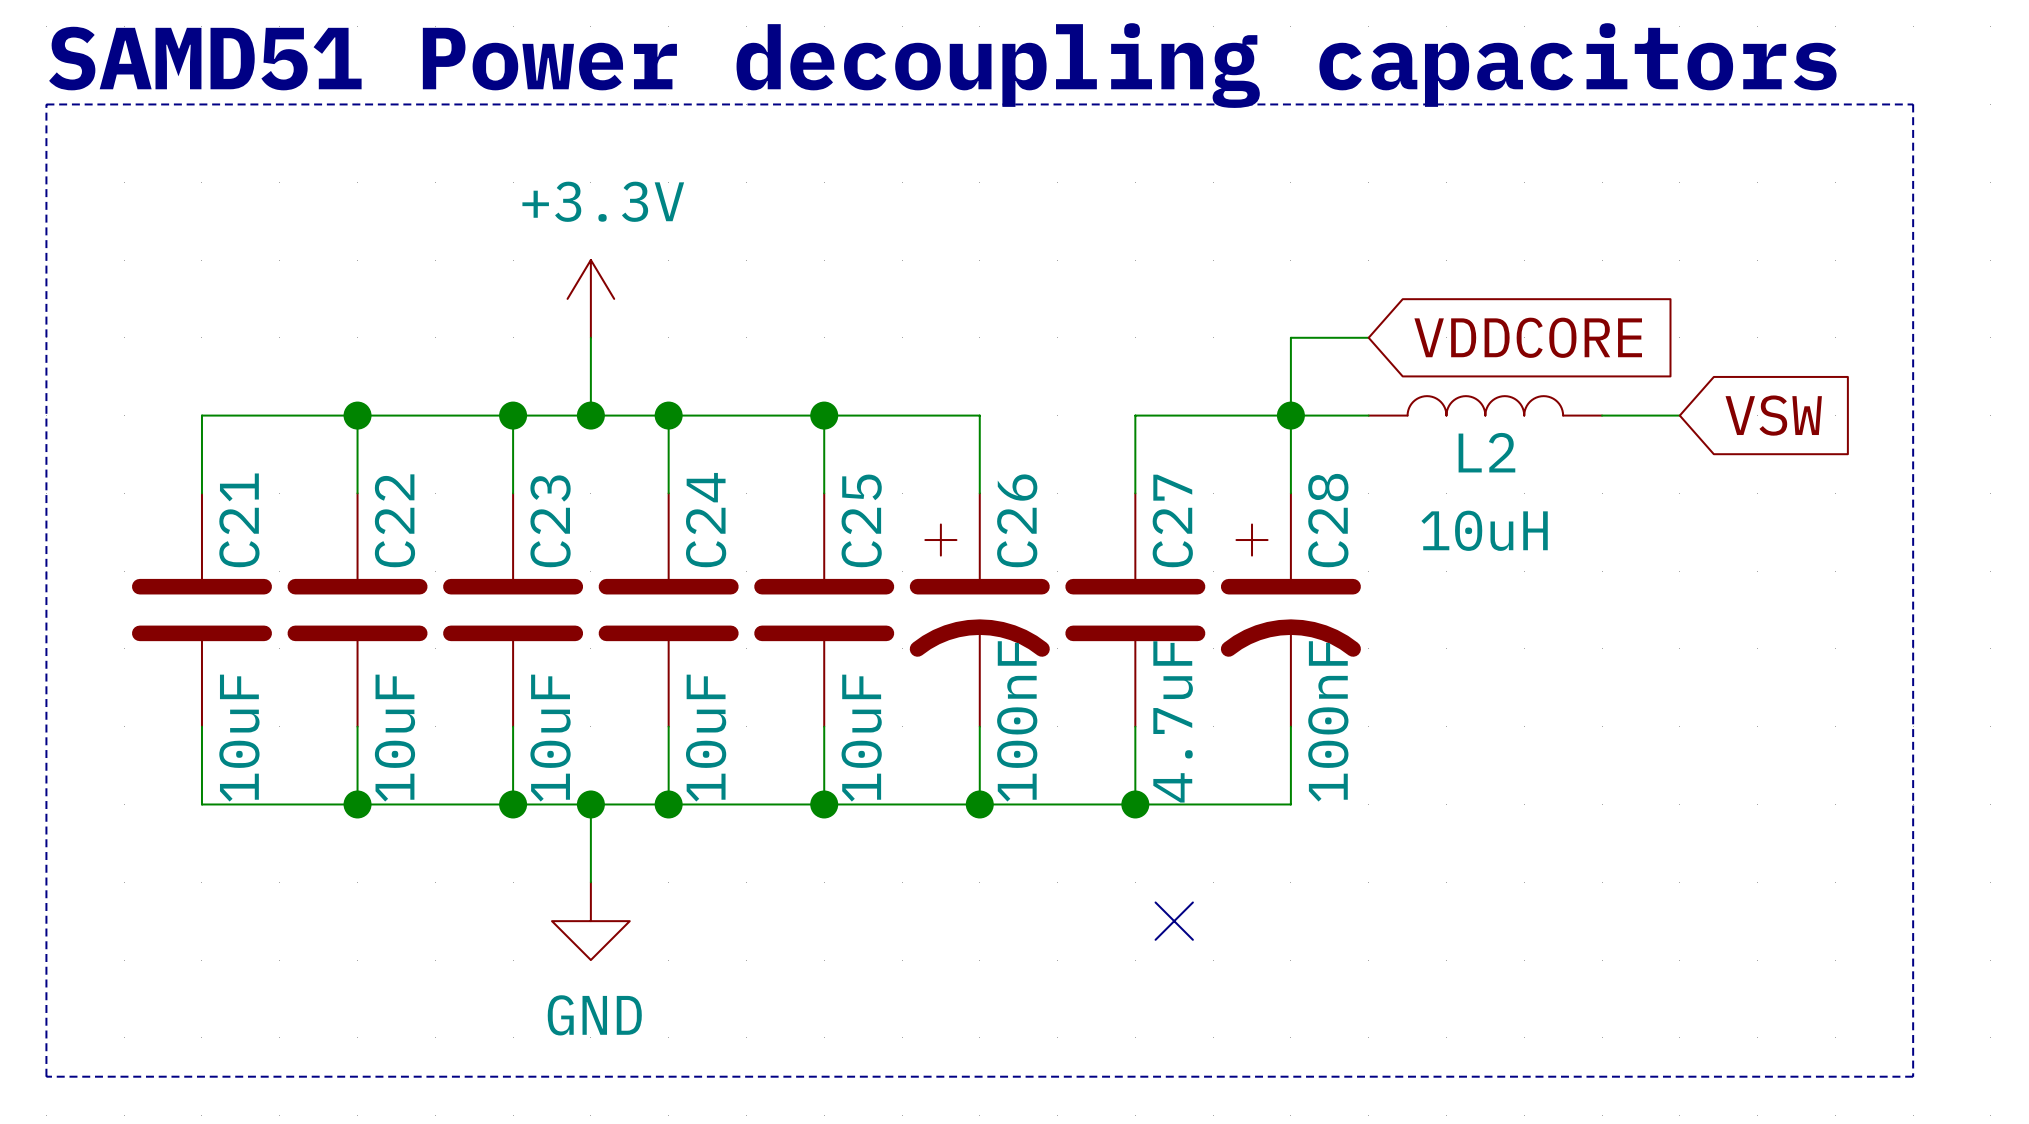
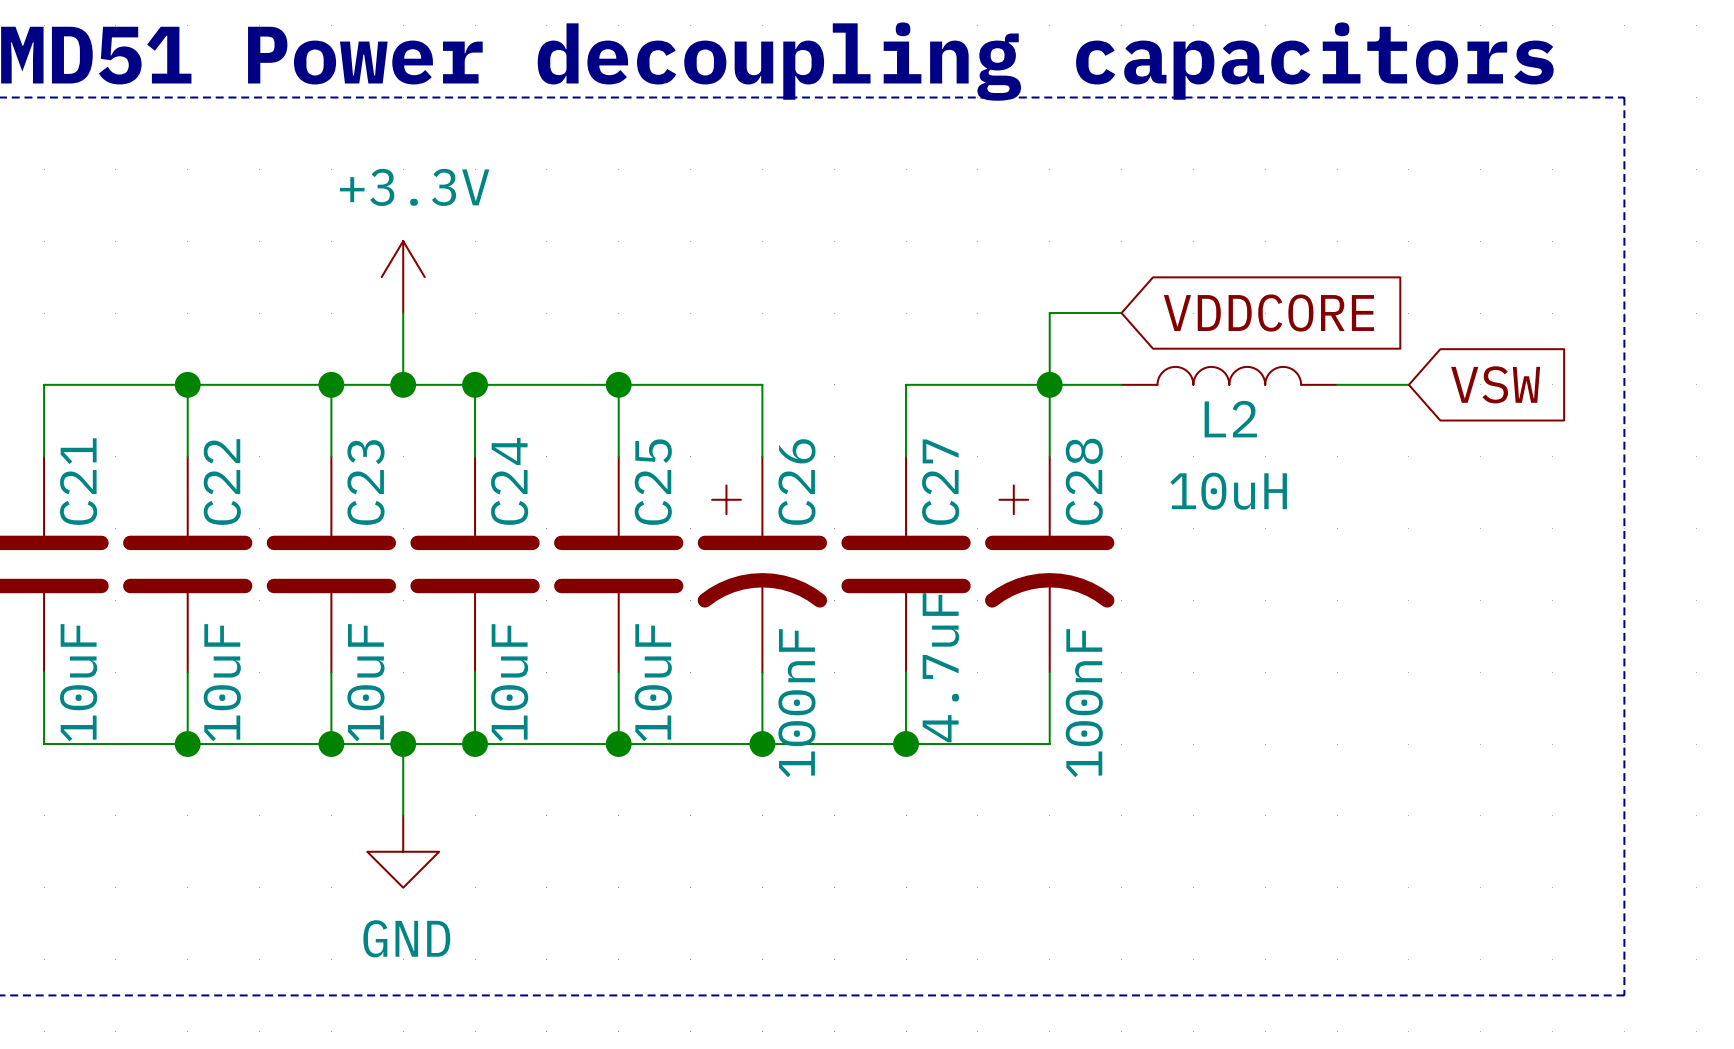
C26 value position: 100nF (1017, 721) -> 100nF (796, 703)
C28 value position: 100nF (1328, 721) -> 100nF (1084, 703)
no-connect mark: (1174, 921) -> none

